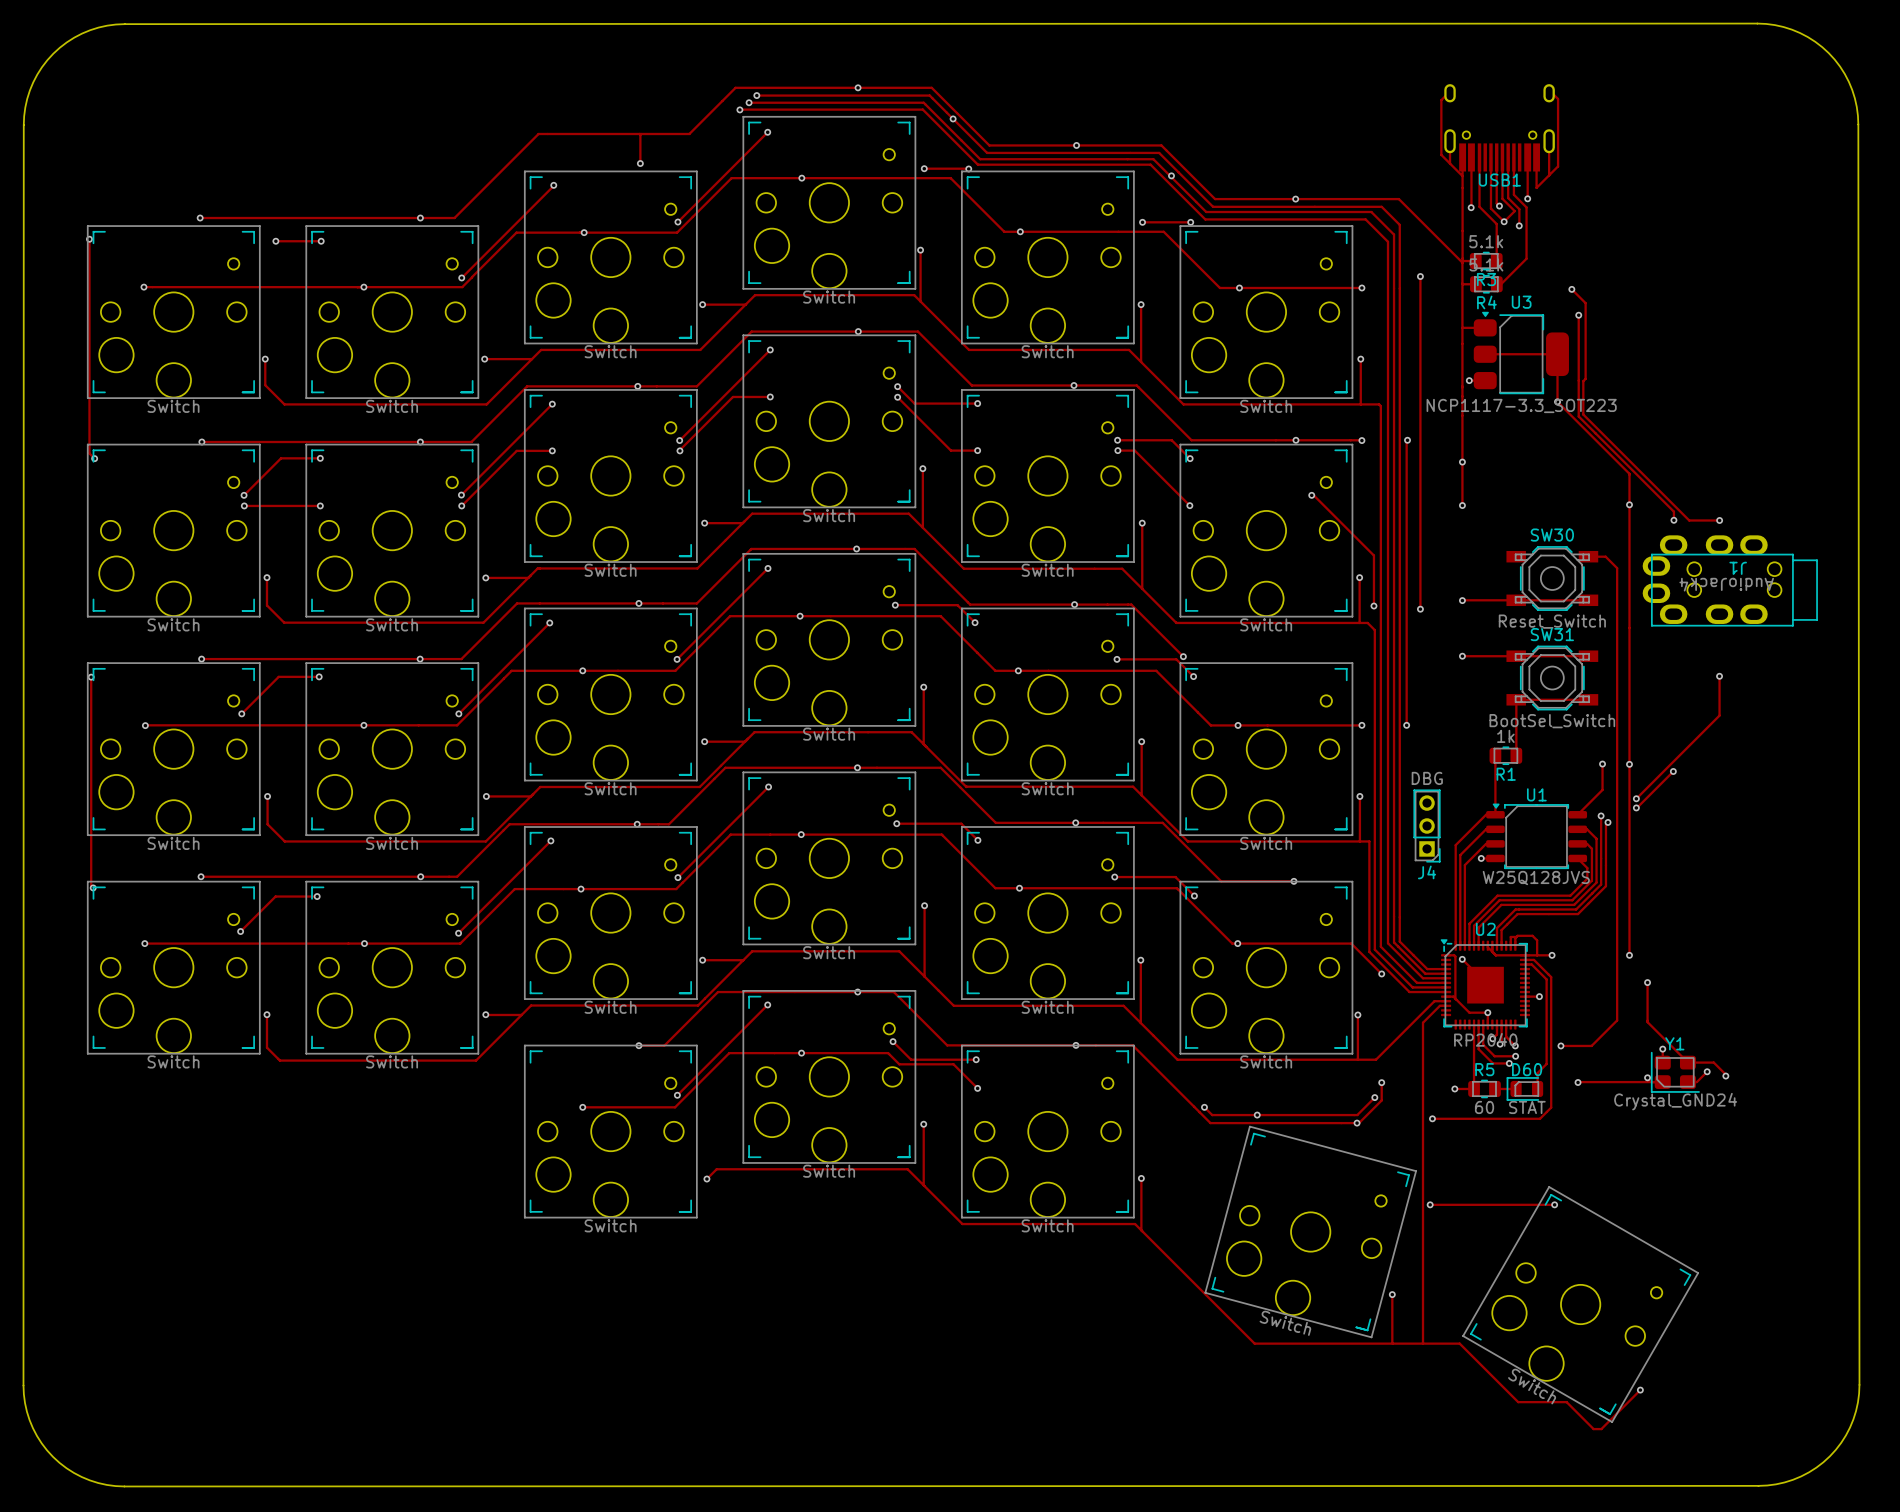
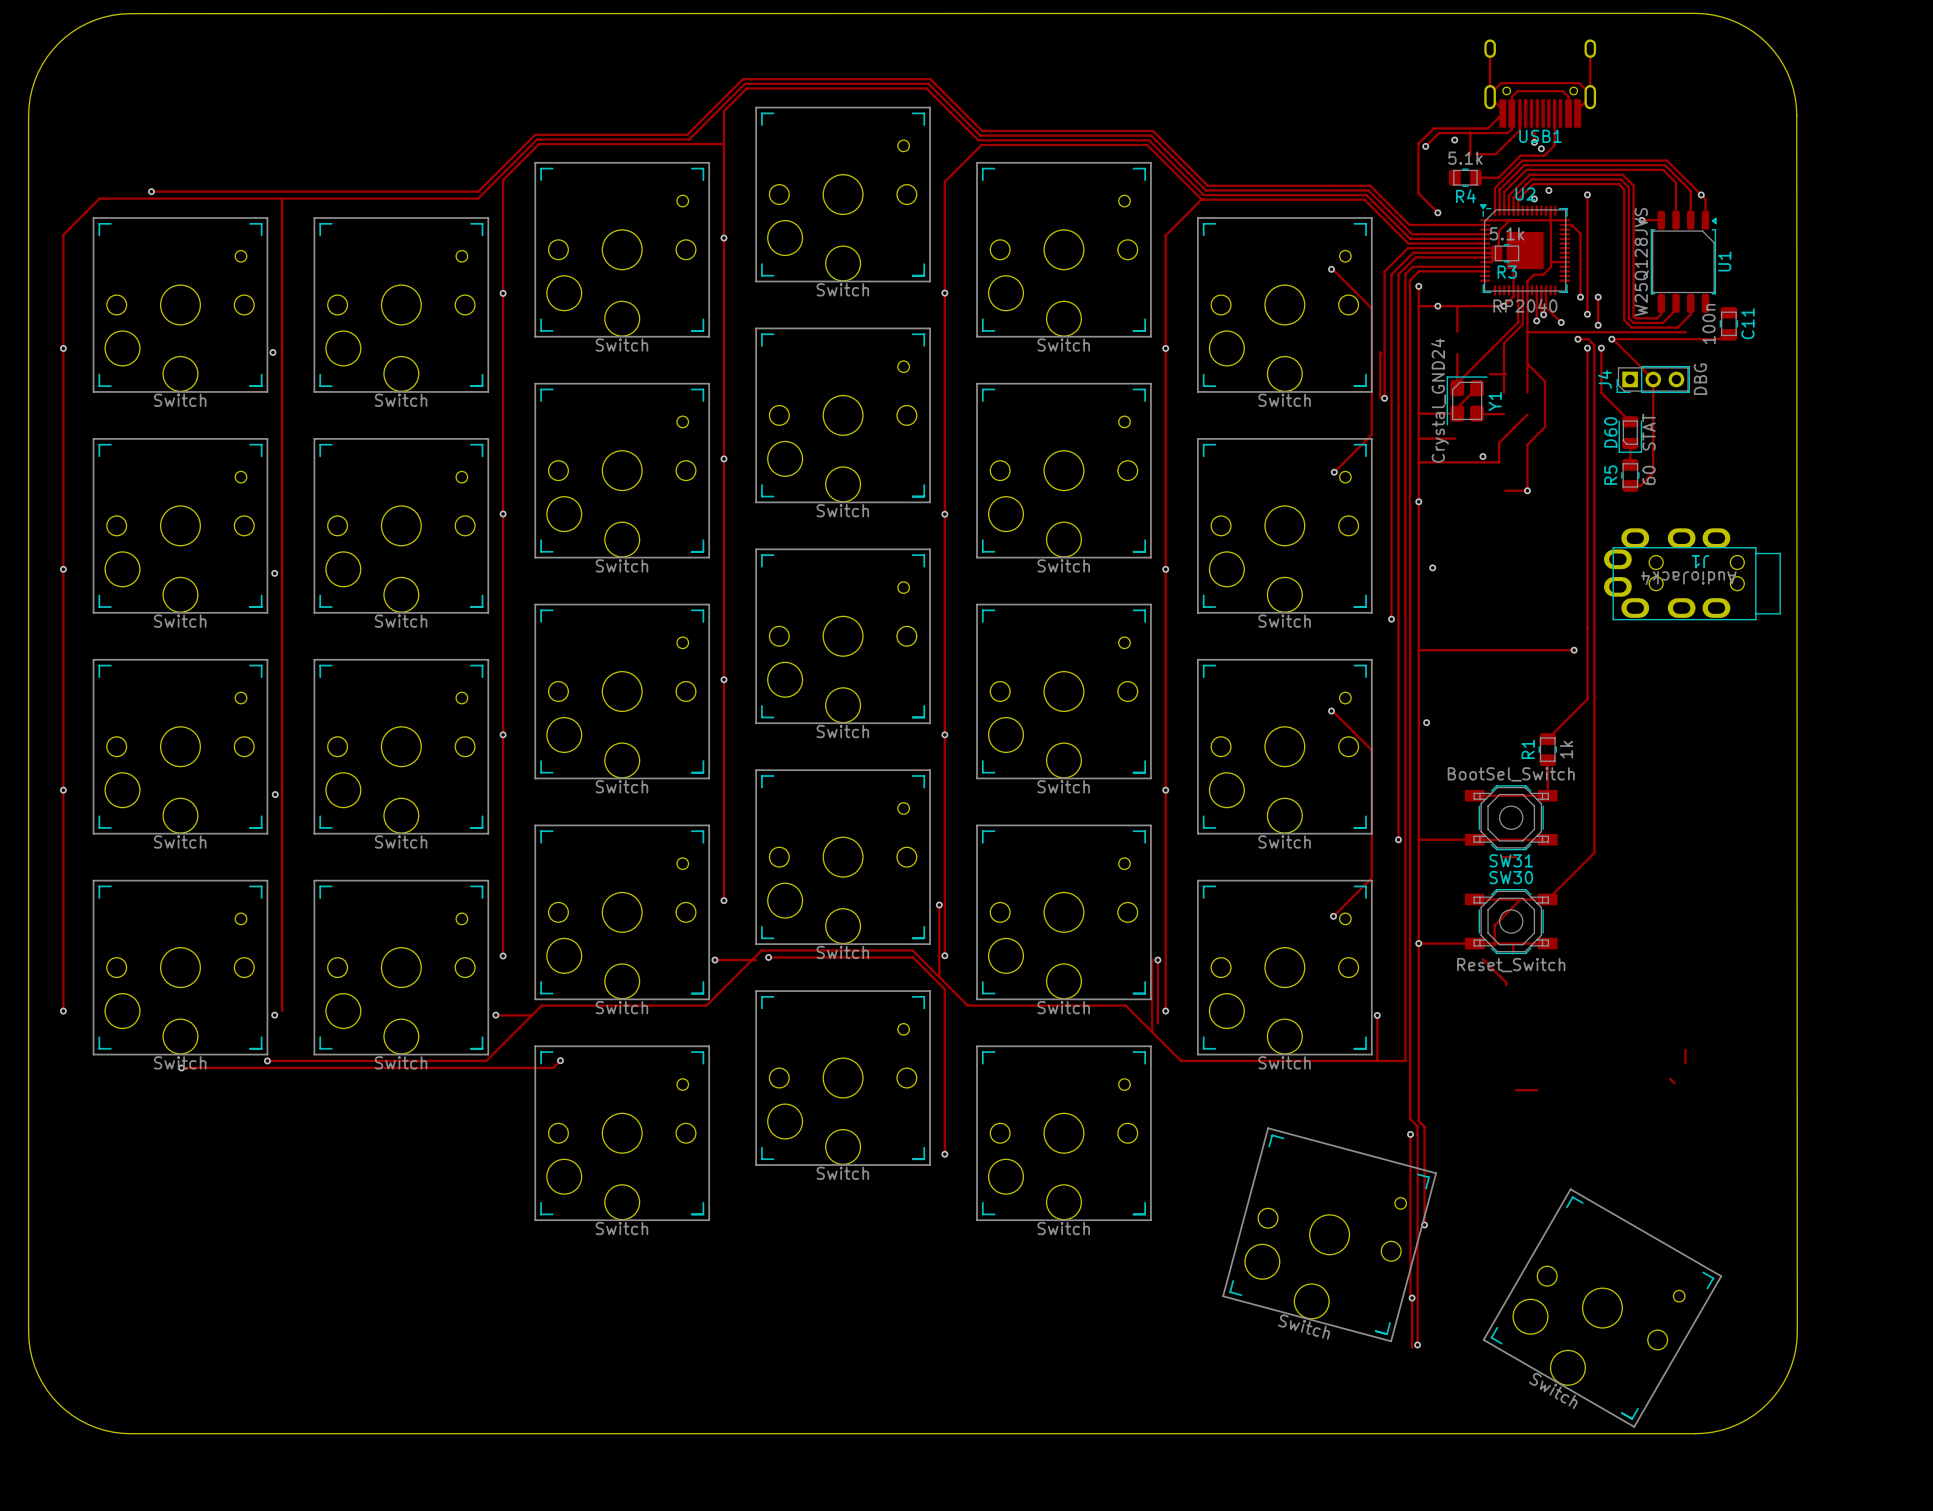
board edge: (1757, 23) (124, 24) (107, 25) (90, 30) (74, 37) (59, 47) (42, 67) (33, 82) (25, 107) (23, 125) (23, 1385) (25, 1403) (29, 1420) (37, 1436) (47, 1450) (59, 1462) (81, 1477) (98, 1483) (124, 1486) (1758, 1485) (1776, 1484) (1793, 1479) (1809, 1472) (1823, 1462) (1841, 1442) (1850, 1427) (1856, 1411) (1859, 1384) (1857, 115) (1854, 98) (1848, 81) (1840, 66) (1828, 53) (1807, 37) (1791, 29) (1774, 25) (1757, 23) -> (1694, 13) (1703, 13) (1712, 14) (1737, 22) (1753, 31) (1766, 43) (1778, 56) (1787, 72) (1793, 88) (1796, 106) (1797, 1331) (1795, 1349) (1787, 1374) (1773, 1397) (1760, 1409) (1746, 1420) (1730, 1427) (1713, 1432) (1695, 1433) (130, 1433) (104, 1430) (87, 1424) (72, 1415) (52, 1397) (42, 1382) (34, 1366) (30, 1349) (28, 1331) (28, 115) (30, 97) (38, 72) (52, 50) (65, 37) (79, 27) (95, 19) (112, 15) (130, 13) (1694, 13)
track: none -> (1490, 48) (1490, 97) (1502, 109) (1502, 113) (1487, 128) (1433, 128) (1418, 143) (1418, 193) (1437, 212)
track: none -> (1590, 48) (1590, 97) (1577, 109) (1577, 113)
via: (858, 87) -> none
track: (1450, 93) (1441, 100) (1441, 154) (1462, 176) -> none
track: (1549, 93) (1552, 93) (1558, 99) (1558, 166) (1536, 187) (1536, 157) -> none
track: (756, 95) (929, 95) (987, 152) (1159, 152) (1213, 206) (1381, 206) (1399, 224) (1399, 941) (1427, 969) (1446, 969) -> none
via: (756, 95) -> none
track: (749, 102) (923, 102) (980, 159) (1153, 159) (1206, 211) (1371, 211) (1394, 234) (1394, 942) (1425, 973) (1446, 973) -> none
via: (749, 102) -> none
track: none -> (1490, 94) (1501, 83) (1579, 83) (1590, 94)
track: (739, 109) (922, 109) (977, 164) (1150, 164) (1205, 219) (1365, 219) (1388, 241) (1388, 943) (1423, 978) (1446, 978) -> none
via: (739, 109) -> none
via: (953, 118) -> none
track: none -> (1519, 113) (1519, 130) (1495, 154) (1475, 154)
track: none -> (1554, 113) (1554, 145) (1544, 155) (1520, 155) (1498, 177) (1476, 177)
track: none -> (1568, 113) (1568, 96) (1562, 91) (1517, 91) (1511, 96) (1511, 129) (1507, 133) (1439, 133) (1425, 146)
USB1 position: (1499, 127) -> (1540, 83)
track: (767, 132) (677, 222) -> none
via: (767, 132) -> none
track: (639, 133) (640, 163) -> none
track: none -> (1534, 131) (1534, 142)
track: (1549, 141) (1549, 175) -> none
via: (1076, 145) -> none
via: none -> (1454, 140)
via: none -> (1534, 142)
track: none -> (723, 144) (539, 144) (503, 180) (503, 956)
via: none -> (1425, 146)
track: (1462, 157) (1462, 262) -> none
track: (1471, 157) (1471, 207) -> none
track: (1479, 157) (1479, 206) (1496, 224) (1496, 261) -> none
track: (1490, 157) (1490, 208) (1504, 221) (1514, 211) (1502, 198) (1502, 157) -> none
track: (1496, 157) (1496, 203) (1499, 206) -> none
track: (1508, 157) (1508, 198) (1519, 209) (1519, 225) -> none
track: (1513, 157) (1513, 194) (1526, 207) (1526, 258) (1501, 284) (1496, 284) -> none
via: none -> (1541, 148)
track: (1527, 157) (1527, 198) -> none
via: (640, 163) -> none
track: (924, 168) (968, 168) -> none
via: (924, 168) -> none
via: (968, 168) -> none
via: (1171, 175) -> none
via: (801, 178) -> none
track: (553, 185) (461, 277) -> none
via: (553, 185) -> none
track: none -> (151, 191) (478, 191) (535, 134) (687, 134) (743, 79) (930, 79) (982, 131) (1153, 131) (1207, 185) (1370, 185) (1409, 224) (1485, 224)
via: none -> (151, 191)
via: (1295, 199) -> none
track: none -> (1587, 194) (1587, 314)
via: none -> (1587, 194)
via: none -> (1701, 194)
track: none -> (282, 198) (282, 1011)
via: (1499, 206) -> none
track: none -> (1201, 199) (1147, 144) (981, 144) (944, 181) (944, 955)
via: (1471, 207) -> none
via: none -> (1534, 198)
track: (200, 218) (454, 218) (538, 133) (689, 133) (735, 87) (931, 87) (989, 145) (1161, 145) (1215, 199) (1398, 199) (1462, 262) (1462, 505) -> none
via: (200, 218) -> none
via: (420, 218) -> none
track: none -> (1494, 210) (1494, 187) (1522, 160) (1666, 160) (1705, 199) (1705, 220)
track: none -> (1499, 210) (1499, 189) (1524, 165) (1665, 165) (1690, 190) (1690, 220)
track: none -> (1504, 210) (1504, 191) (1526, 169) (1663, 169) (1676, 182) (1676, 220)
track: none -> (1508, 210) (1508, 195) (1529, 174) (1622, 174) (1633, 185) (1633, 316) (1635, 318) (1657, 318) (1661, 314) (1661, 303)
track: none -> (1513, 210) (1513, 197) (1531, 179) (1620, 179) (1628, 187) (1628, 318) (1633, 322) (1662, 322) (1676, 309) (1676, 303)
track: none -> (1518, 210) (1518, 199) (1533, 184) (1618, 184) (1624, 189) (1624, 320) (1631, 327) (1677, 327) (1690, 314) (1690, 303)
track: none -> (1550, 210) (1550, 267) (1543, 274) (1533, 274) (1527, 281) (1527, 392)
via: none -> (1437, 212)
via: (1504, 221) -> none
via: (677, 222) -> none
track: (1142, 222) (1190, 222) -> none
via: (1142, 222) -> none
via: (1190, 222) -> none
via: (1519, 225) -> none
track: none -> (1485, 220) (1565, 220)
track: none -> (1509, 220) (1498, 231) (1498, 255) (1491, 262) (1485, 262)
track: none -> (1642, 220) (1661, 220)
via: none -> (1641, 220)
via: (1020, 231) -> none
via: (584, 232) -> none
track: none -> (1565, 224) (1571, 224) (1580, 233) (1580, 297)
track: (89, 239) (89, 453) (94, 458) -> none
via: (89, 239) -> none
track: (275, 241) (321, 241) -> none
via: (275, 241) -> none
via: (321, 241) -> none
track: none -> (1485, 234) (1412, 234) (1368, 190) (1205, 190) (1151, 135) (980, 135) (928, 83) (744, 83) (689, 139) (537, 139) (477, 198) (99, 198) (63, 234) (63, 1011)
via: none -> (723, 238)
track: none -> (1485, 238) (1410, 238) (1366, 195) (1203, 195) (1149, 140) (978, 140) (926, 88) (746, 88) (723, 111) (723, 900)
track: (920, 250) (920, 301) -> none
via: (920, 250) -> none
track: none -> (1485, 243) (1408, 243) (1364, 199) (1201, 199) (1165, 235) (1165, 1011)
track: none -> (1485, 248) (1408, 248) (1384, 271) (1384, 398)
track: none -> (1525, 250) (1513, 262) (1513, 296) (1503, 306) (1418, 306)
track: none -> (1485, 252) (1413, 252) (1391, 274) (1391, 619)
track: none -> (1485, 257) (1415, 257) (1398, 274) (1398, 839)
track: none -> (1550, 262) (1565, 262)
track: none -> (1485, 266) (1412, 266) (1405, 274) (1405, 1060) (1181, 1060) (1125, 1005) (967, 1005) (912, 950) (761, 950) (706, 1005) (541, 1005) (486, 1060) (267, 1060)
track: none -> (1331, 269) (1371, 308) (1371, 434) (1334, 472)
via: none -> (1331, 269)
track: (1420, 276) (1420, 609) -> none
via: (1420, 276) -> none
via: (461, 277) -> none
track: none -> (1485, 271) (1419, 271) (1410, 280) (1410, 1118)
track: (1462, 283) (1475, 284) -> none
R4 position: (1486, 284) -> (1465, 177)
track: (143, 287) (462, 287) (516, 232) (677, 232) (731, 178) (950, 178) (1004, 231) (1163, 231) (1219, 287) (1361, 287) -> none
via: (143, 287) -> none
via: (363, 287) -> none
via: (1239, 287) -> none
via: (1361, 287) -> none
track: (1571, 289) (1585, 303) (1585, 378) (1583, 381) (1583, 414) (1689, 520) (1719, 520) -> none
via: (1571, 289) -> none
track: none -> (1418, 286) (1418, 1121) (1424, 1126) (1424, 1224)
via: none -> (1418, 286)
track: none -> (1518, 290) (1518, 322) (1457, 383)
track: none -> (1522, 290) (1522, 324) (1503, 343) (1503, 392)
track: none -> (1536, 290) (1536, 320)
track: none -> (1541, 290) (1541, 312) (1543, 314)
track: none -> (1546, 290) (1546, 307) (1561, 322)
via: none -> (503, 293)
via: none -> (944, 293)
track: (702, 304) (745, 304) -> none
via: (702, 304) -> none
track: (1141, 304) (1141, 361) -> none
via: (1141, 304) -> none
via: none -> (1580, 297)
track: none -> (1598, 297) (1598, 325)
via: none -> (1598, 297)
via: none -> (1437, 306)
track: none -> (1457, 306) (1457, 331)
via: none -> (1503, 306)
track: (1578, 315) (1578, 416) (1673, 511) (1673, 520) -> none
via: (1578, 315) -> none
via: none -> (1543, 314)
via: none -> (1587, 314)
track: (1462, 327) (1485, 327) -> none
via: none -> (1536, 320)
via: none -> (1561, 322)
C11: none -> 100n (1728, 323)
via: (858, 331) -> none
via: none -> (1598, 325)
track: none -> (1527, 332) (1686, 332)
track: none -> (1728, 334) (1724, 339) (1611, 339)
via: none -> (1577, 339)
via: none -> (1611, 339)
track: none -> (1612, 339) (1653, 379) (1653, 473) (1640, 485) (1630, 485)
track: (770, 349) (679, 440) -> none
via: (770, 349) -> none
U3: NCP1117-3.3_SOT223 (1521, 352) -> none
track: (1485, 354) (1557, 354) (1557, 401) (1629, 473) (1629, 955) -> none
track: none -> (1587, 348) (1587, 699) (1547, 739)
via: none -> (1587, 348)
track: none -> (1601, 348) (1601, 392) (1630, 421)
via: none -> (1601, 348)
via: none -> (63, 348)
via: none -> (1165, 348)
track: (265, 359) (265, 385) (284, 404) (486, 404) (541, 349) (700, 349) (755, 295) (914, 295) (969, 349) (1129, 349) (1183, 404) (1379, 404) (1380, 406) (1380, 946) (1416, 982) (1446, 982) -> none
track: (484, 359) (531, 359) -> none
via: (484, 359) -> none
via: (1360, 359) -> none
track: none -> (1457, 353) (1457, 388)
track: none -> (1527, 363) (1545, 381) (1545, 427) (1527, 444) (1527, 490) (1505, 490)
via: (1469, 380) -> none
via: (1073, 385) -> none
via: (637, 386) -> none
track: (897, 386) (914, 403) (977, 403) -> none
via: (897, 386) -> none
track: none -> (1477, 388) (1457, 407) (1457, 413) (1418, 413)
track: (770, 396) (732, 396) (679, 450) -> none
via: (770, 396) -> none
track: (897, 397) (950, 450) (977, 450) -> none
via: (897, 397) -> none
via: (1557, 401) -> none
via: (977, 403) -> none
track: (552, 404) (461, 495) -> none
via: (552, 404) -> none
via: none -> (1384, 398)
track: none -> (1477, 413) (1503, 414)
track: none -> (1527, 414) (1499, 442) (1499, 462) (1418, 462)
via: (679, 440) -> none
track: (1117, 440) (1171, 440) (1190, 458) -> none
via: (1117, 440) -> none
via: (1295, 440) -> none
track: (1361, 440) (1191, 440) (1136, 385) (971, 385) (917, 331) (751, 331) (696, 386) (527, 386) (471, 441) (201, 441) -> none
via: (1361, 440) -> none
track: (1407, 440) (1406, 725) -> none
via: (1407, 440) -> none
via: (201, 441) -> none
via: (420, 441) -> none
track: none -> (1418, 438) (1455, 438)
track: none -> (1630, 443) (1630, 464)
track: (552, 450) (516, 450) (461, 505) -> none
via: (552, 450) -> none
via: (679, 450) -> none
via: (977, 450) -> none
track: (1117, 450) (1134, 450) (1189, 505) -> none
via: (1117, 450) -> none
via: (94, 458) -> none
track: (320, 458) (281, 458) (244, 495) -> none
via: (320, 458) -> none
via: (1190, 458) -> none
via: none -> (723, 458)
track: (922, 468) (922, 527) -> none
via: (922, 468) -> none
via: (244, 495) -> none
via: (461, 495) -> none
track: (1311, 495) (1373, 555) (1373, 606) -> none
via position: (1311, 495) -> (1334, 472)
via: none -> (1527, 490)
via: (1629, 504) -> none
track: (244, 505) (320, 505) -> none
via: (244, 505) -> none
via: (320, 505) -> none
via: (461, 505) -> none
via: (1189, 505) -> none
via: (1462, 505) -> none
via: none -> (1418, 501)
via: none -> (503, 513)
via: none -> (944, 514)
via: (1673, 520) -> none
via: (1719, 520) -> none
track: (704, 523) (742, 523) -> none
via: (704, 523) -> none
track: (1142, 523) (1142, 588) -> none
via: (1142, 523) -> none
via: (856, 548) -> none
track: (1588, 556) (1605, 556) (1617, 568) (1617, 1020) (1591, 1045) (1560, 1045) -> none
track: (768, 568) (677, 659) -> none
via: (768, 568) -> none
via: none -> (1432, 567)
via: none -> (63, 569)
via: none -> (1165, 569)
track: (266, 577) (266, 605) (284, 622) (483, 622) (537, 568) (697, 568) (752, 513) (908, 513) (963, 568) (1122, 568) (1176, 622) (1367, 622) (1374, 630) (1374, 949) (1412, 987) (1446, 987) -> none
track: (485, 577) (528, 577) -> none
via: (485, 577) -> none
track: (1359, 577) (1359, 622) -> none
via: (1359, 577) -> none
SW30 position: (1552, 578) -> (1511, 921)
J1 position: (1730, 580) -> (1692, 574)
via: (1462, 600) -> none
track: (1588, 600) (1462, 600) -> none
via: (638, 603) -> none
via: (1074, 604) -> none
track: (895, 605) (957, 605) (975, 622) -> none
via: (895, 605) -> none
via position: (1373, 606) -> (1391, 619)
via: (1420, 609) -> none
via: (800, 616) -> none
track: (549, 622) (458, 713) -> none
via: (549, 622) -> none
via: (975, 622) -> none
SW31 name position: SW31 (1552, 634) -> SW31 (1511, 860)
track: none -> (1418, 650) (1573, 650)
via: none -> (1574, 650)
track: (1183, 656) (1131, 604) (970, 604) (914, 548) (751, 548) (696, 603) (517, 603) (461, 659) (201, 659) -> none
via: (1183, 656) -> none
track: (1462, 656) (1588, 656) -> none
via: (1462, 656) -> none
via: (201, 659) -> none
via: (420, 659) -> none
via: (677, 659) -> none
track: (1117, 659) (1176, 659) (1193, 676) -> none
via: (1117, 659) -> none
via: (582, 670) -> none
via: (1018, 670) -> none
track: (319, 676) (278, 676) (241, 713) -> none
via: (319, 676) -> none
via: (1193, 676) -> none
track: (1719, 676) (1719, 715) (1636, 798) -> none
via: (1719, 676) -> none
track: (91, 677) (91, 885) (93, 887) -> none
via: (91, 677) -> none
SW31 position: (1552, 678) -> (1511, 817)
via: none -> (723, 679)
track: (923, 687) (923, 744) -> none
via: (923, 687) -> none
track: (1516, 699) (1588, 699) -> none
track: (1516, 699) (1516, 755) -> none
via: (241, 713) -> none
via: (458, 713) -> none
track: none -> (1331, 711) (1371, 750) (1371, 878) (1333, 916)
via: none -> (1331, 711)
SW31 value position: BootSel_Switch (1552, 721) -> BootSel_Switch (1511, 774)
via: (145, 725) -> none
via: (363, 725) -> none
via: (1238, 725) -> none
track: (1361, 725) (1210, 725) (1156, 670) (995, 670) (940, 616) (730, 616) (675, 670) (511, 670) (457, 725) (145, 725) -> none
via: (1361, 725) -> none
via: none -> (503, 734)
via: none -> (944, 734)
track: (704, 741) (745, 741) -> none
via: (704, 741) -> none
track: (1141, 741) (1141, 795) -> none
via: (1141, 741) -> none
track: (1495, 755) (1495, 814) (1486, 814) (1455, 845) (1455, 945) -> none
R1 rotation: 0° (1505, 755) -> 90° clockwise (1547, 749)
R1 position: (1505, 755) -> (1547, 749)
track: none -> (1547, 760) (1547, 795) (1474, 795)
track: (1602, 764) (1602, 789) (1577, 814) -> none
via: (1602, 764) -> none
via: (1629, 764) -> none
via: (857, 767) -> none
track: (1673, 771) (1636, 807) -> none
via: (1673, 771) -> none
track: (768, 786) (677, 877) -> none
via: (768, 786) -> none
via: none -> (63, 790)
via: none -> (1165, 790)
track: (267, 796) (267, 824) (284, 841) (485, 841) (540, 786) (699, 786) (754, 732) (911, 732) (966, 786) (1133, 786) (1187, 841) (1369, 841) (1369, 951) (1409, 992) (1446, 992) -> none
track: (486, 796) (530, 796) -> none
via: (486, 796) -> none
track: (1359, 796) (1359, 841) -> none
via: (1359, 796) -> none
via: (1636, 798) -> none
via: (1636, 807) -> none
track: (1601, 815) (1601, 884) (1576, 909) (1515, 909) (1496, 928) (1496, 945) -> none
via: (1601, 815) -> none
via: (1075, 822) -> none
track: (1608, 822) (1605, 824) (1605, 886) (1578, 914) (1517, 914) (1501, 930) (1501, 945) -> none
via: (1608, 822) -> none
track: (896, 823) (961, 823) (977, 840) -> none
via: (896, 823) -> none
via: (637, 824) -> none
J4 rotation: 0° (1427, 825) -> 90° clockwise (1653, 379)
J4 position: (1427, 825) -> (1653, 379)
track: (1495, 829) (1486, 829) (1460, 855) (1460, 945) -> none
track: (1577, 829) (1587, 829) (1596, 838) (1596, 882) (1574, 904) (1501, 904) (1478, 927) (1478, 945) -> none
via: (801, 834) -> none
U1 rotation: 0° (1536, 836) -> 90° clockwise (1683, 261)
U1 position: (1536, 836) -> (1683, 261)
track: (550, 840) (458, 933) -> none
via: (550, 840) -> none
via: (977, 840) -> none
via: none -> (1398, 839)
track: none -> (1418, 839) (1547, 839)
track: (1495, 843) (1486, 843) (1464, 865) (1464, 945) -> none
track: (1577, 843) (1587, 843) (1591, 848) (1591, 880) (1572, 900) (1526, 900) -> (1577, 339) (1588, 339) (1594, 345) (1594, 852) (1547, 899)
via: (1481, 858) -> none
track: (1577, 858) (1587, 868) (1587, 878) (1570, 895) (1497, 895) (1469, 923) (1469, 945) -> none
track: (201, 876) (457, 876) (509, 824) (668, 824) (725, 767) (940, 767) (995, 822) (1162, 822) (1221, 881) (1293, 881) -> none
via: (201, 876) -> none
via: (420, 876) -> none
via position: (677, 877) -> (723, 900)
track: (1114, 877) (1175, 877) (1194, 895) -> none
via: (1114, 877) -> none
via: (1293, 881) -> none
via: (93, 887) -> none
via: (1019, 888) -> none
via: (581, 889) -> none
via: (1194, 895) -> none
track: (317, 896) (275, 896) (240, 931) -> none
via: (317, 896) -> none
via: none -> (1333, 916)
via: (240, 931) -> none
via position: (458, 933) -> (503, 956)
track: (1516, 936) (1510, 936) (1510, 945) -> none
track: (144, 943) (460, 943) (514, 889) (676, 889) (730, 834) (941, 834) (995, 888) (1176, 888) (1232, 943) (1351, 943) (1381, 973) -> none
via: (144, 943) -> none
via: (364, 943) -> none
via: (1237, 943) -> none
track: none -> (1418, 943) (1547, 943)
via: none -> (1418, 943)
track: (1487, 945) (1495, 955) (1552, 955) -> none
track: (1515, 945) (1515, 938) (1517, 935) (1532, 935) (1537, 940) (1537, 955) -> none
via: none -> (944, 955)
track: (1446, 955) (1455, 956) (1455, 998) -> none
via: (1552, 955) -> none
via: (1629, 955) -> none
track: none -> (768, 957) (913, 957) (944, 989) (944, 1154)
track: none -> (1152, 959) (1152, 1031)
via: (1462, 959) -> none
track: (1524, 959) (1533, 959) (1551, 977) (1551, 1107) (1540, 1118) (1432, 1118) -> none
track: (1524, 964) (1531, 964) (1546, 979) (1546, 1064) (1537, 1073) (1537, 1088) -> none
via: (1381, 973) -> none
track: (1647, 982) (1647, 1022) (1687, 1062) (1713, 1062) (1725, 1076) -> none
via: (1647, 982) -> none
U2 position: (1485, 984) -> (1524, 249)
via: (857, 992) -> none
track: (1446, 996) (1453, 996) (1469, 1012) (1487, 1012) (1487, 1024) -> none
track: (1524, 996) (1539, 996) -> none
via: (1539, 996) -> none
track: (1446, 1001) (1434, 1001) (1375, 1059) (1177, 1059) (1123, 1005) (953, 1005) (899, 951) (752, 951) (698, 1005) (531, 1005) (476, 1060) (279, 1060) (266, 1047) (266, 1014) -> none
track: (767, 1004) (677, 1095) -> none
via position: (767, 1004) -> (768, 957)
track: (1446, 1005) (1439, 1005) (1423, 1022) (1423, 1343) -> none
via: none -> (63, 1011)
via: none -> (1165, 1011)
via: (1487, 1012) -> none
track: (1474, 1024) (1474, 1088) (1454, 1088) -> none
track: (1478, 1024) (1478, 1049) (1492, 1063) (1509, 1063) -> none
track: (1483, 1024) (1483, 1044) (1494, 1056) (1515, 1056) -> none
track: (1496, 1024) (1496, 1034) (1492, 1038) -> none
track: (1501, 1024) (1500, 1044) -> none
track: (1506, 1024) (1506, 1036) (1515, 1045) -> none
via: (1492, 1038) -> none
track: (893, 1041) (911, 1059) (976, 1059) -> none
via: (893, 1041) -> none
via: (1500, 1044) -> none
track: (638, 1045) (664, 1045) (718, 992) (893, 992) (947, 1045) (1132, 1045) (1210, 1123) (1359, 1123) (1381, 1100) (1381, 1082) -> none
via: (638, 1045) -> none
via: (1076, 1045) -> none
via: (1515, 1045) -> none
via: (1560, 1045) -> none
via: (1662, 1049) -> none
via: (801, 1053) -> none
via: (1515, 1056) -> none
track: none -> (560, 1060) (553, 1067) (261, 1067)
via: none -> (560, 1060)
via: (976, 1059) -> none
via: none -> (267, 1060)
via: (1509, 1063) -> none
track: none -> (181, 1067) (261, 1067)
via: none -> (181, 1067)
R5 name position: R5 (1484, 1069) -> R5 (1610, 475)
track: (1707, 1071) (1696, 1082) (1687, 1082) -> none
via: (1707, 1071) -> none
Y1 rotation: 0° (1675, 1072) -> 90° clockwise (1467, 400)
Y1 position: (1675, 1072) -> (1467, 400)
via: (1725, 1076) -> none
via: (1647, 1077) -> none
via: (1381, 1082) -> none
via: (1578, 1082) -> none
track: (1662, 1082) (1578, 1082) -> none
track: (977, 1088) (953, 1064) (899, 1064) (888, 1053) (729, 1053) (675, 1107) (582, 1107) -> none
via: (977, 1088) -> none
via: (1454, 1088) -> none
R5 rotation: 0° (1484, 1088) -> 90° clockwise (1630, 475)
R5 position: (1484, 1088) -> (1630, 475)
D60 rotation: 0° (1524, 1088) -> 90° counterclockwise (1630, 434)
D60 position: (1524, 1088) -> (1630, 434)
via: (677, 1095) -> none
track: (1374, 1097) (1357, 1115) (1212, 1115) (1204, 1107) -> none
via: (1374, 1097) -> none
via: (582, 1107) -> none
via: (1204, 1107) -> none
R5 value position: 60 (1484, 1107) -> 60 (1649, 475)
via: (1257, 1115) -> none
track: none -> (1410, 1118) (1417, 1126) (1417, 1135)
via: (1432, 1118) -> none
via: (1357, 1123) -> none
track: (923, 1124) (923, 1185) -> none
via position: (923, 1124) -> (944, 1154)
track: none -> (1410, 1134) (1410, 1294)
via: none -> (1410, 1134)
track: none -> (1417, 1135) (1417, 1344)
track: (1141, 1178) (1141, 1230) -> none
via: (1141, 1178) -> none
track: (706, 1179) (716, 1169) (907, 1169) (962, 1224) (1135, 1224) (1254, 1343) (1459, 1343) (1518, 1402) (1566, 1402) (1593, 1429) (1601, 1429) (1640, 1390) -> none
via: (706, 1179) -> none
track: (1430, 1204) (1554, 1204) -> none
via position: (1430, 1204) -> (1424, 1224)
via: (1554, 1204) -> none
via: none -> (1417, 1344)
via: (1640, 1390) -> none

